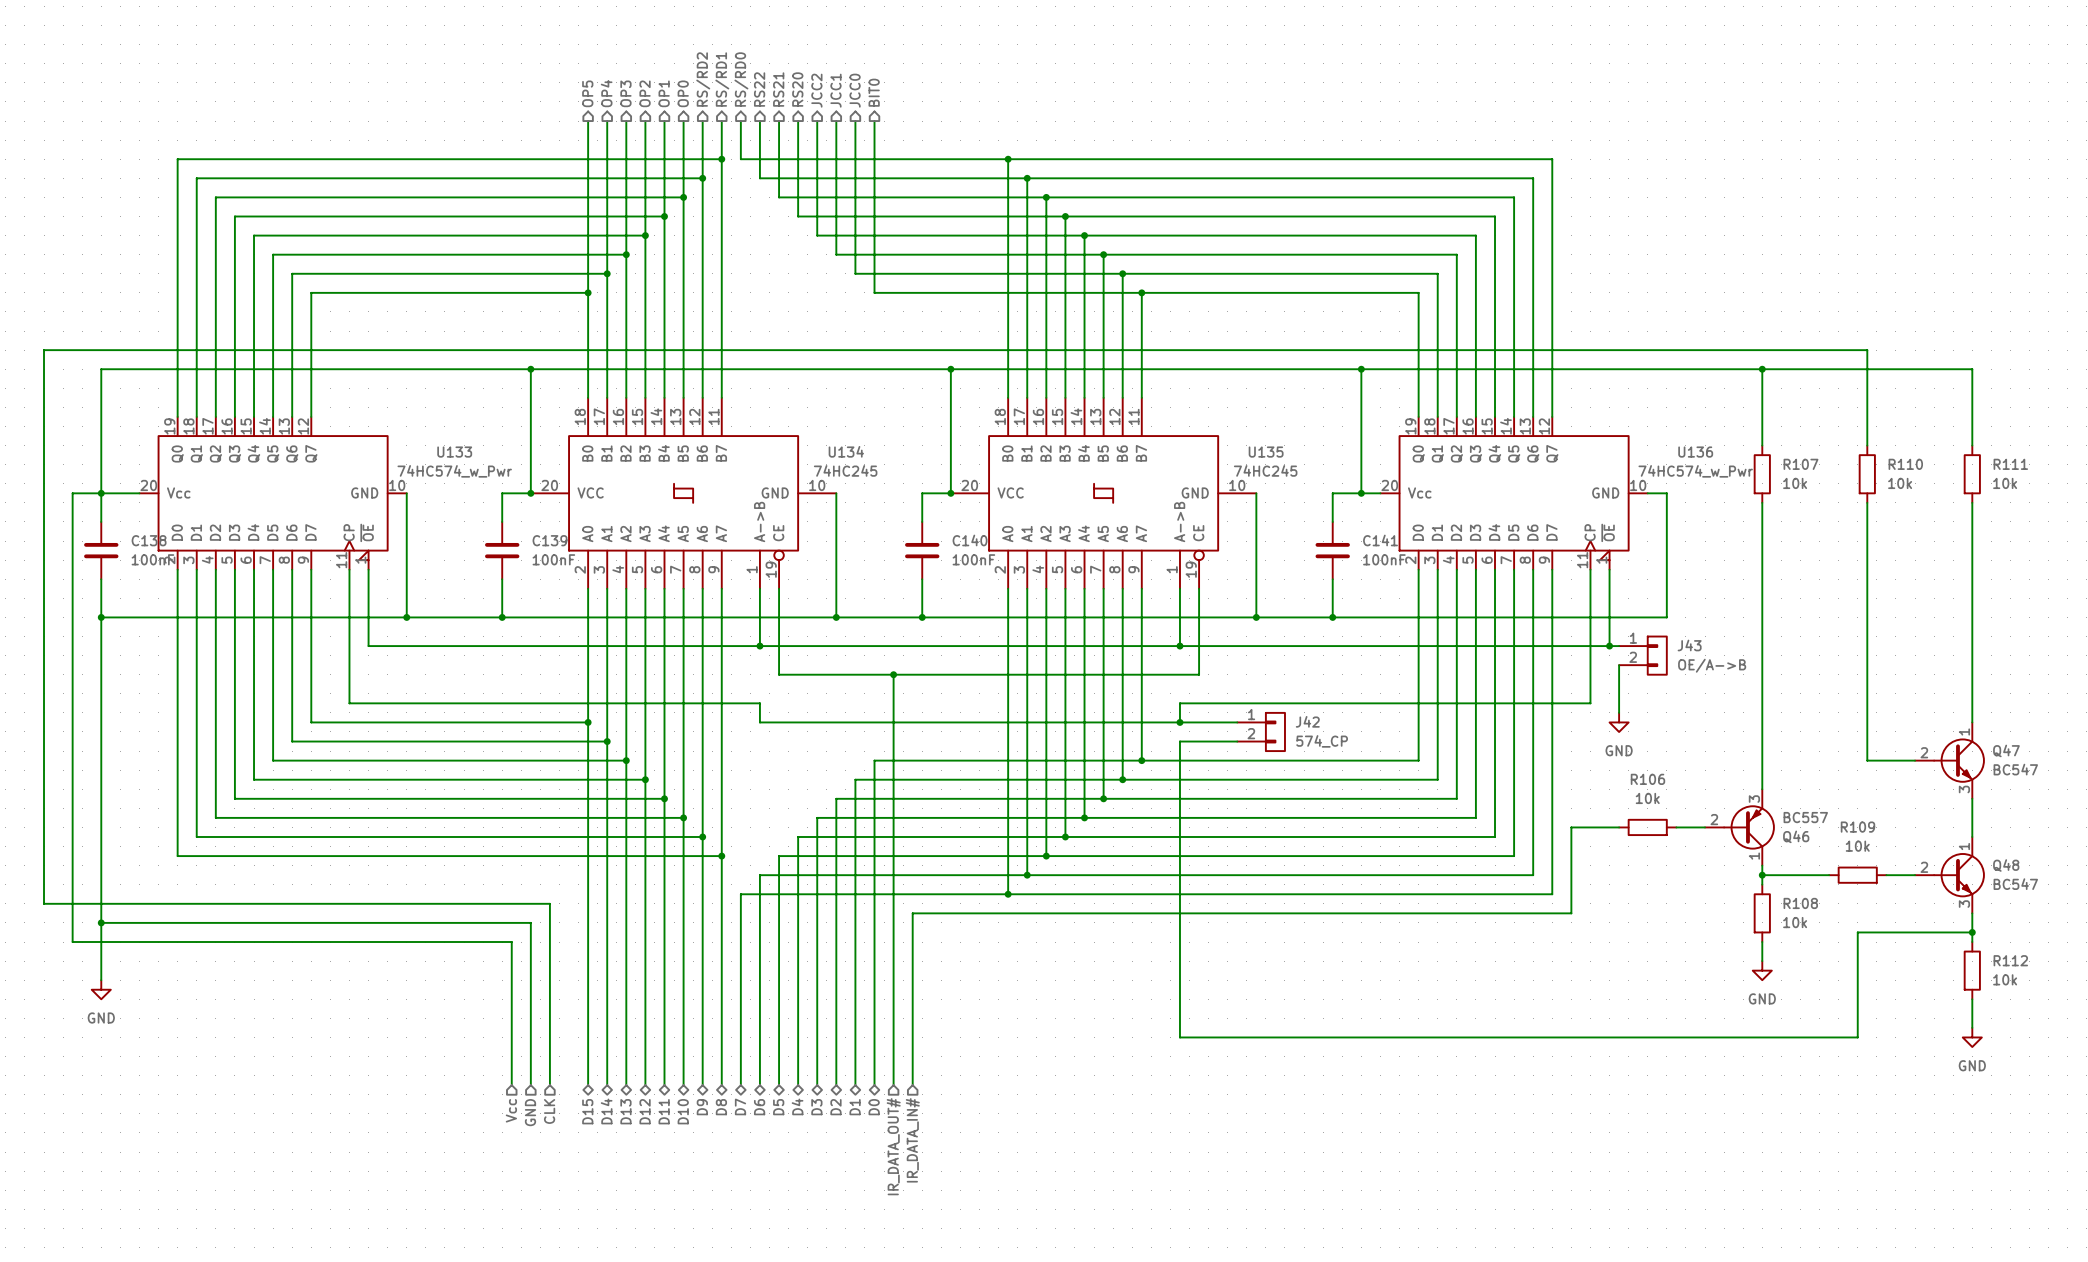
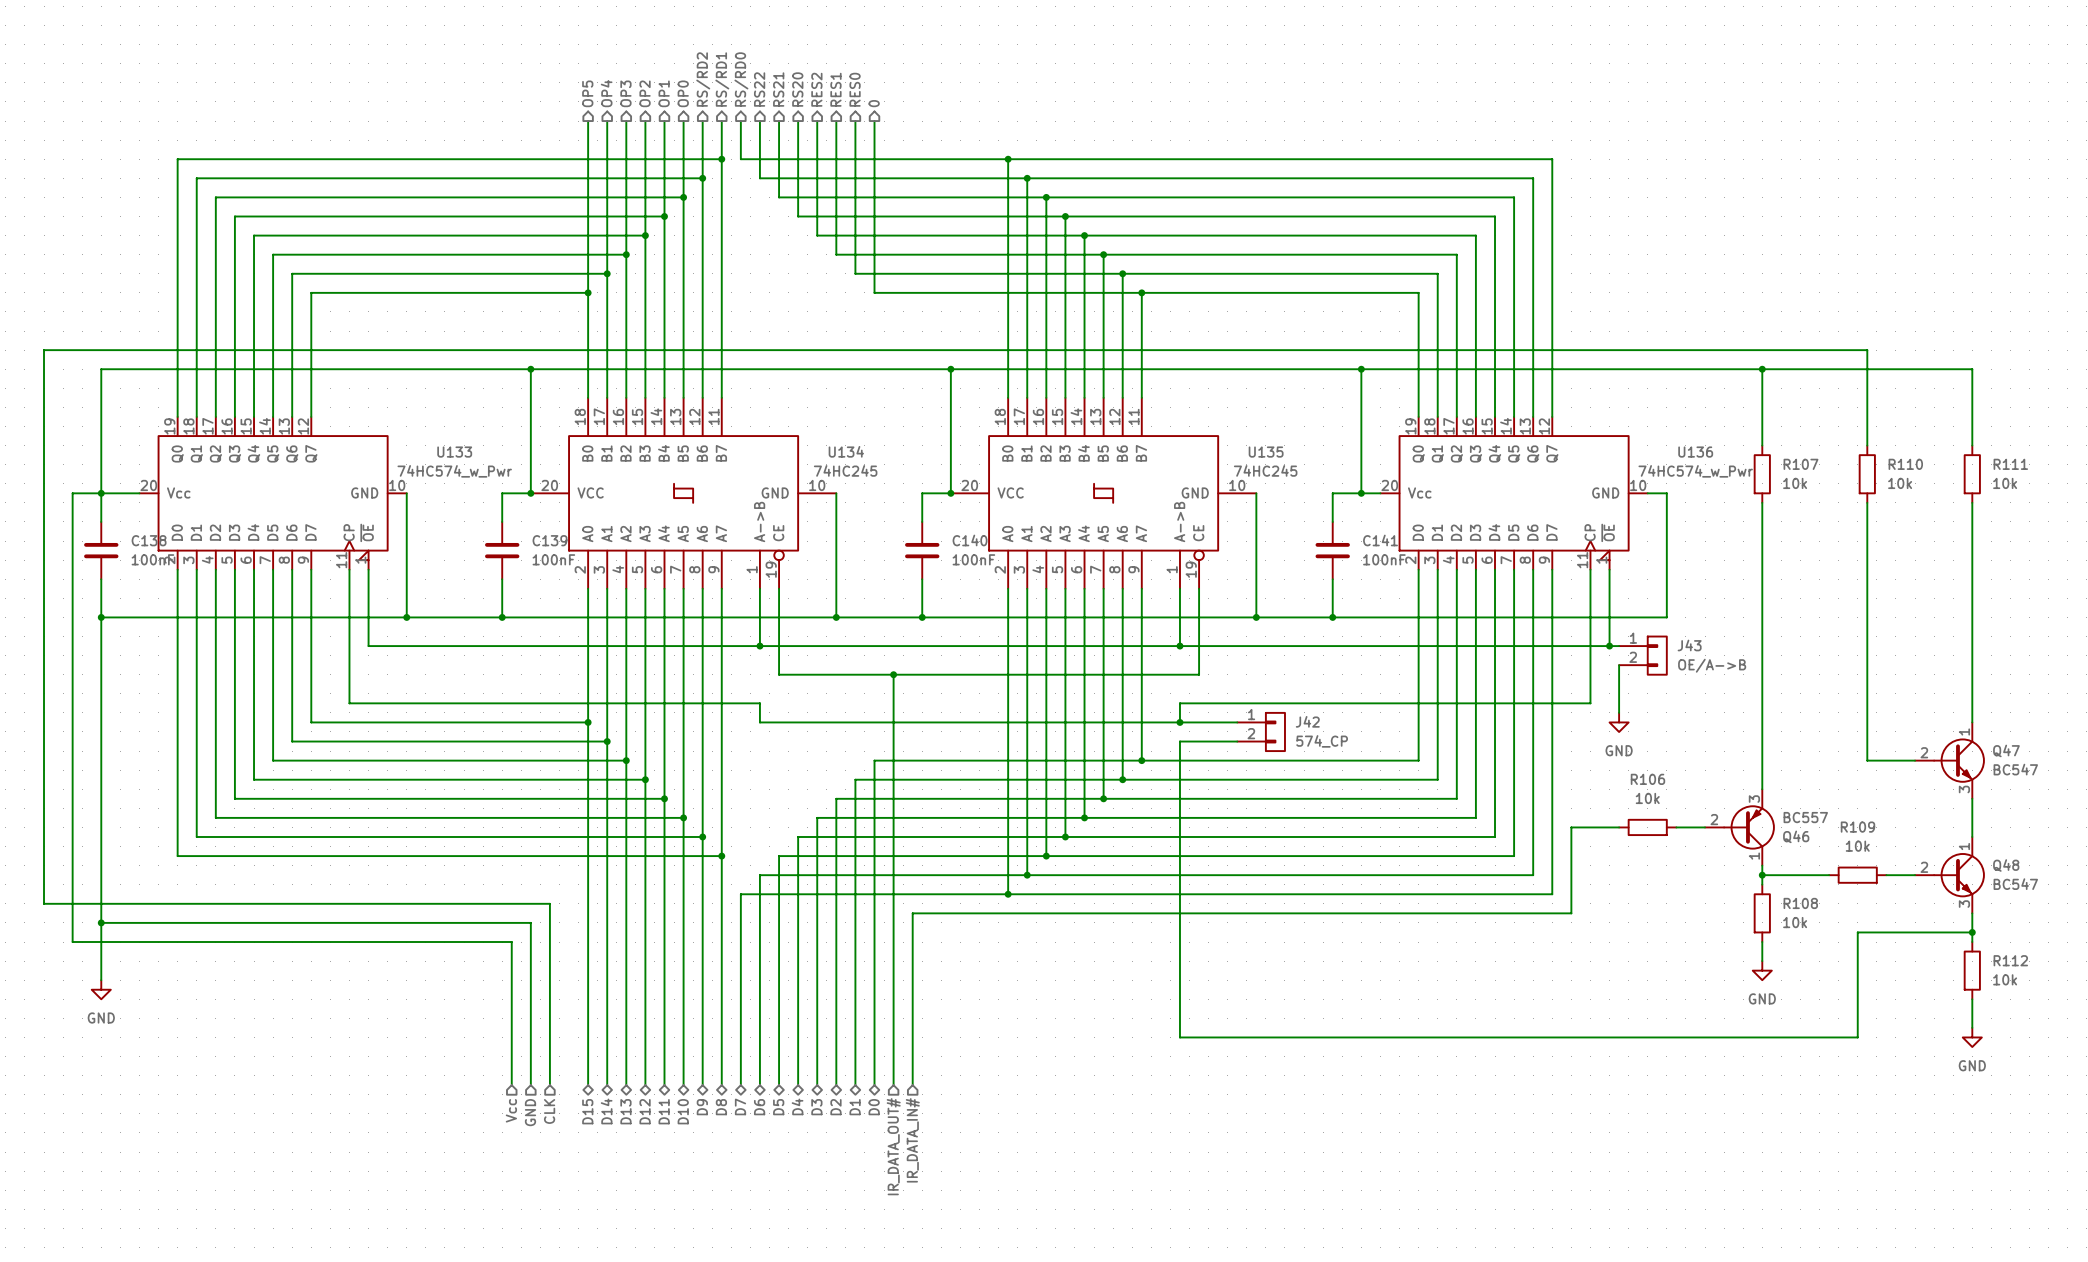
hierarchical label: JCC2 (816, 90) -> RES2 (816, 89)
hierarchical label: JCC1 (835, 90) -> RES1 (835, 89)
hierarchical label: JCC0 (855, 90) -> RES0 (855, 89)
hierarchical label: BIT0 (874, 92) -> 0 (874, 103)

